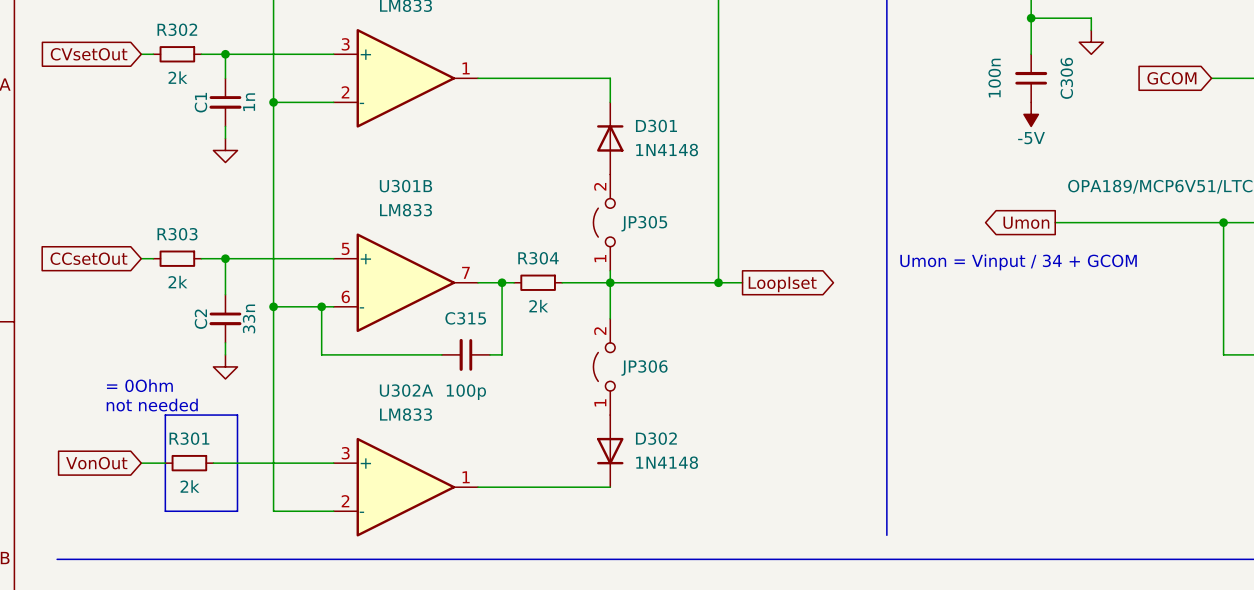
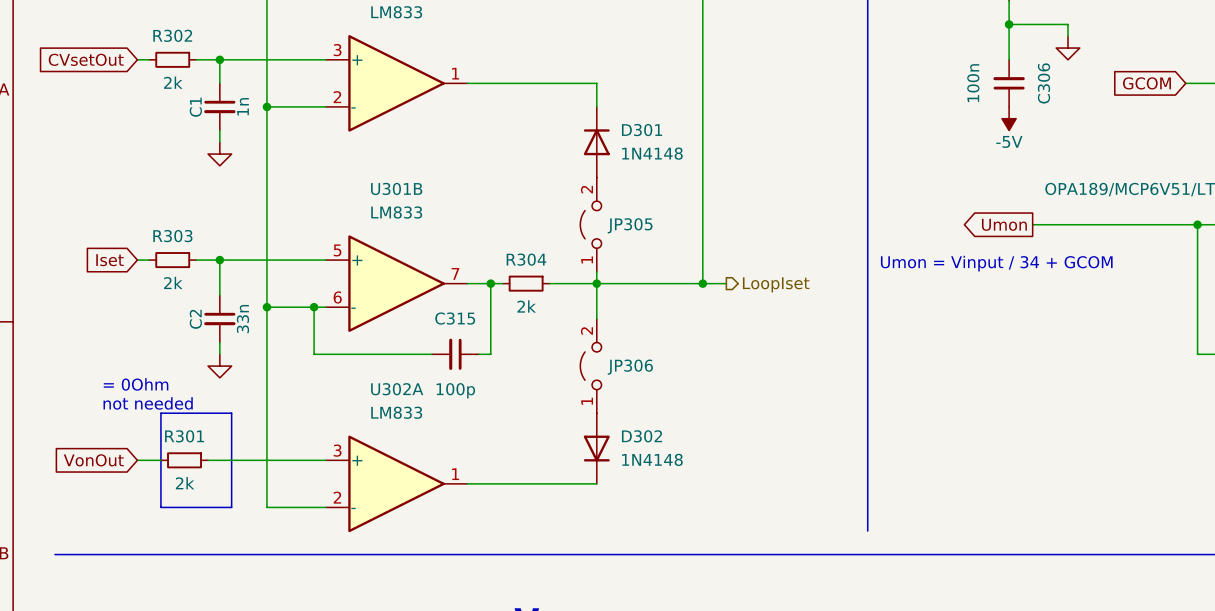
global label: CCsetOut (88, 258) -> Iset (110, 260)
global label: LoopIset (782, 284) -> none
hierarchical label: none -> LoopIset (776, 284)

